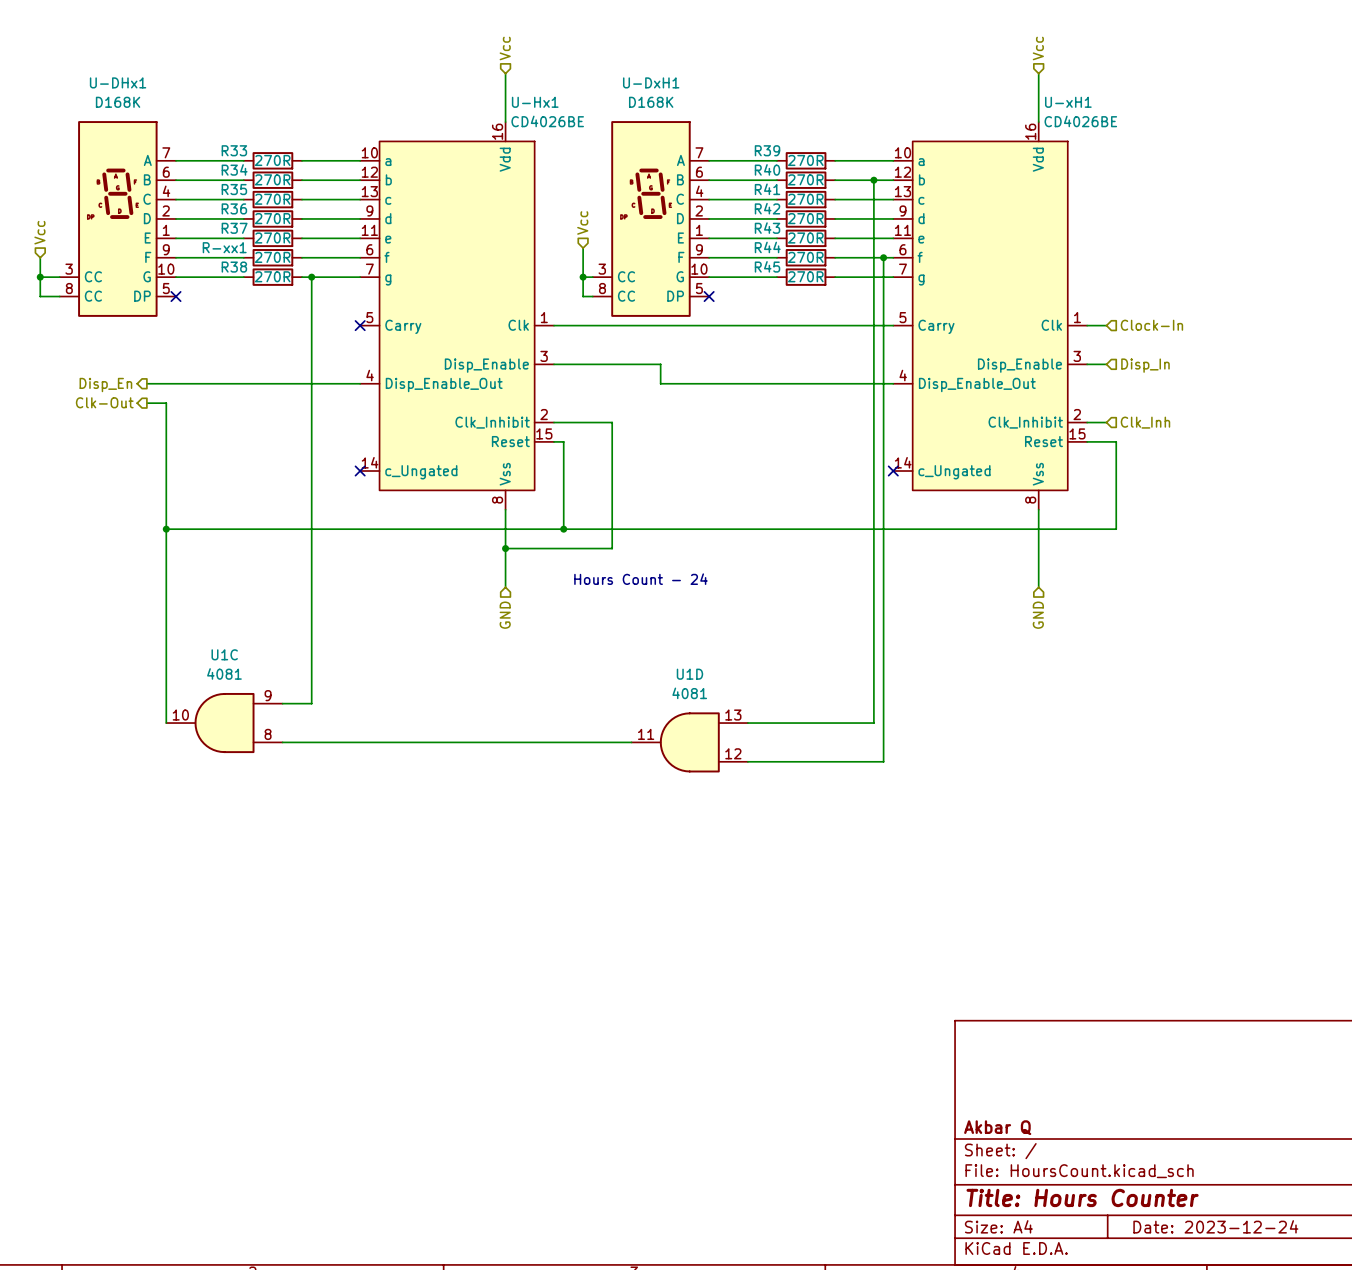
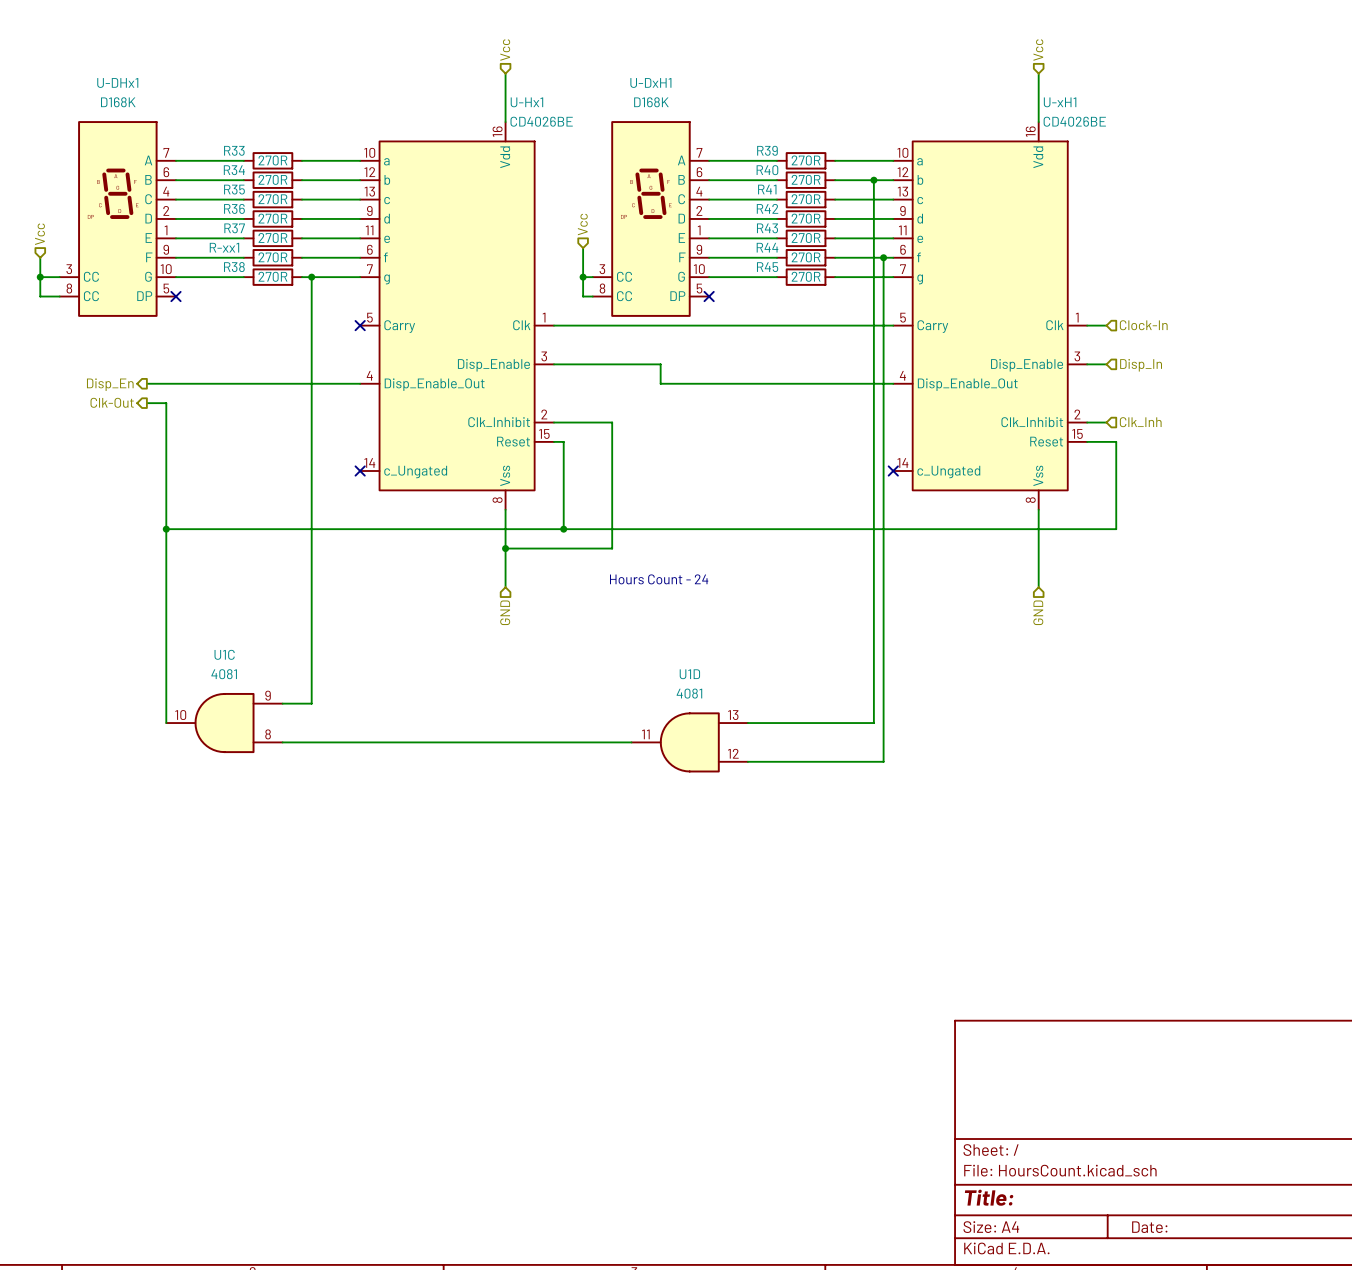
title block: Akbar Q (997, 1127) -> none
title block: Title: Hours Counter (1082, 1197) -> Title: (989, 1197)
title block: Date: 2023-12-24 (1215, 1226) -> Date: (1149, 1227)

